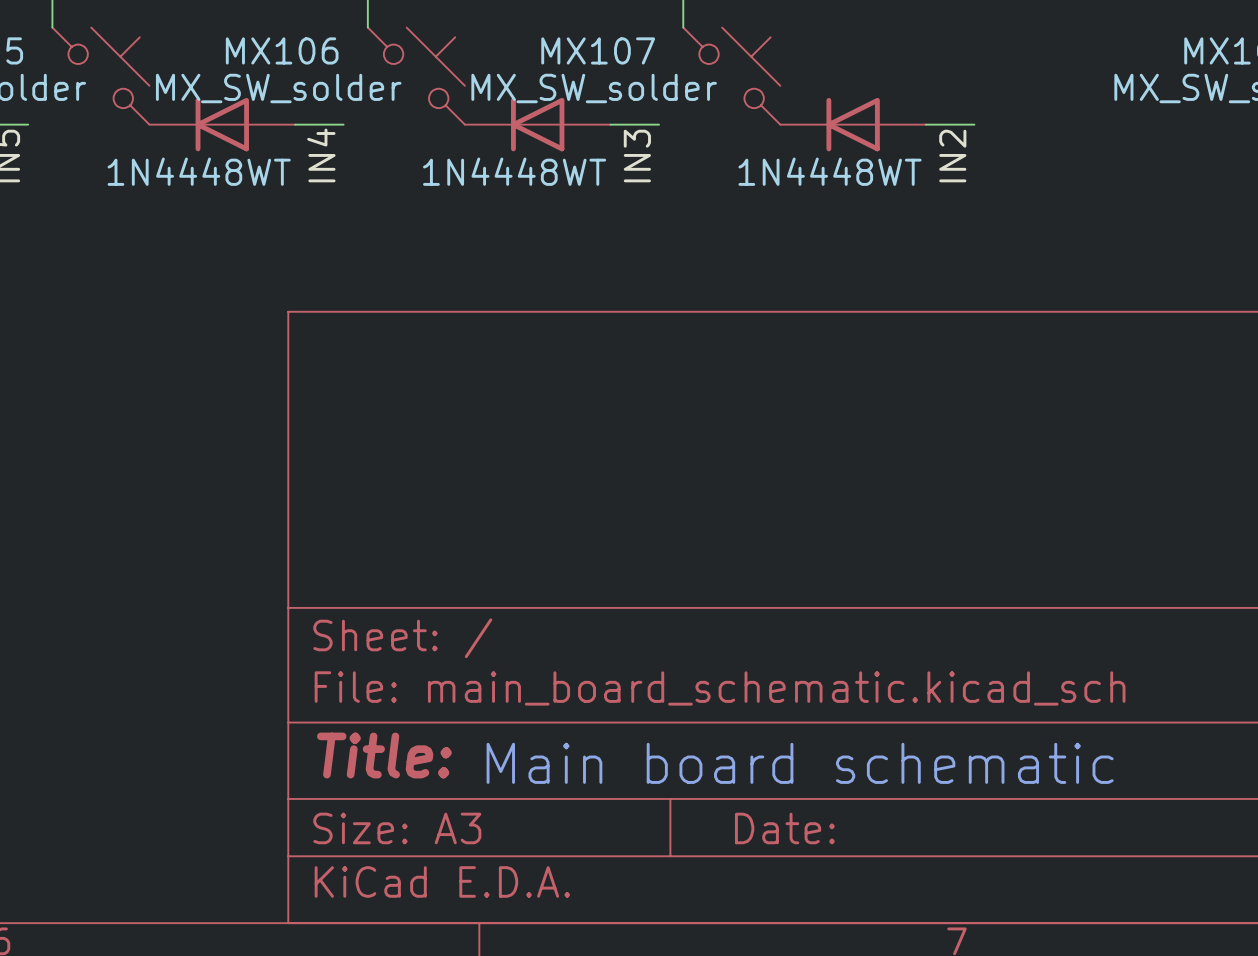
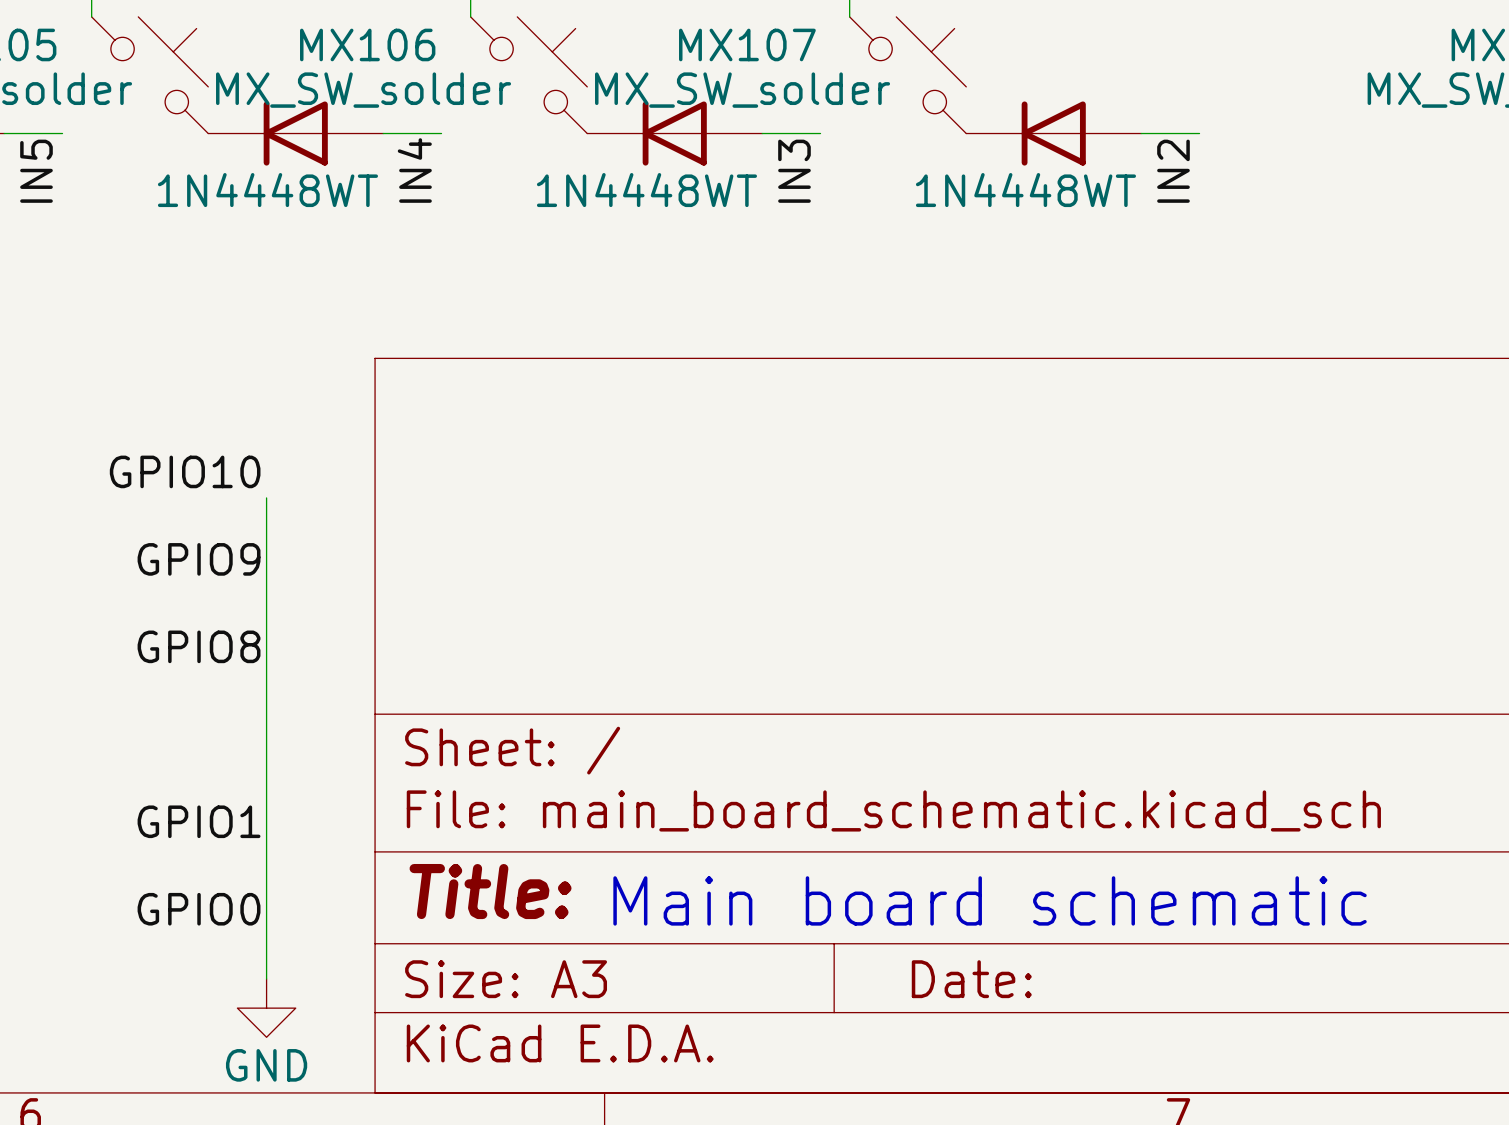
label: none -> GPIO10 (185, 471)
wire: none -> (266, 497) (266, 978)
label: none -> GPIO9 (199, 559)
label: none -> GPIO8 (199, 646)
label: none -> GPIO1 (199, 821)
label: none -> GPIO0 (199, 909)
power symbol: none -> GND (266, 1008)

